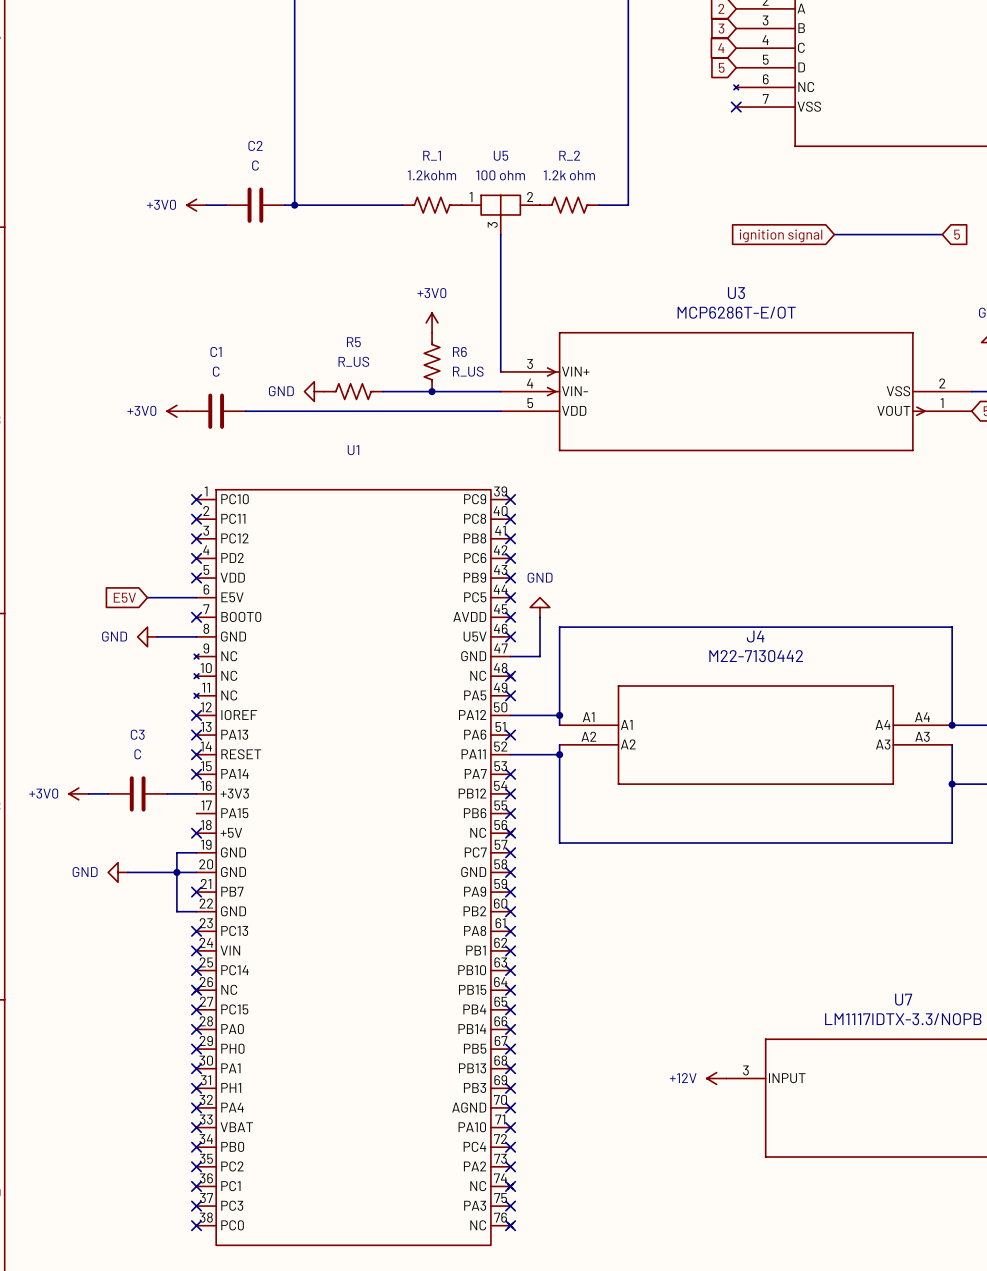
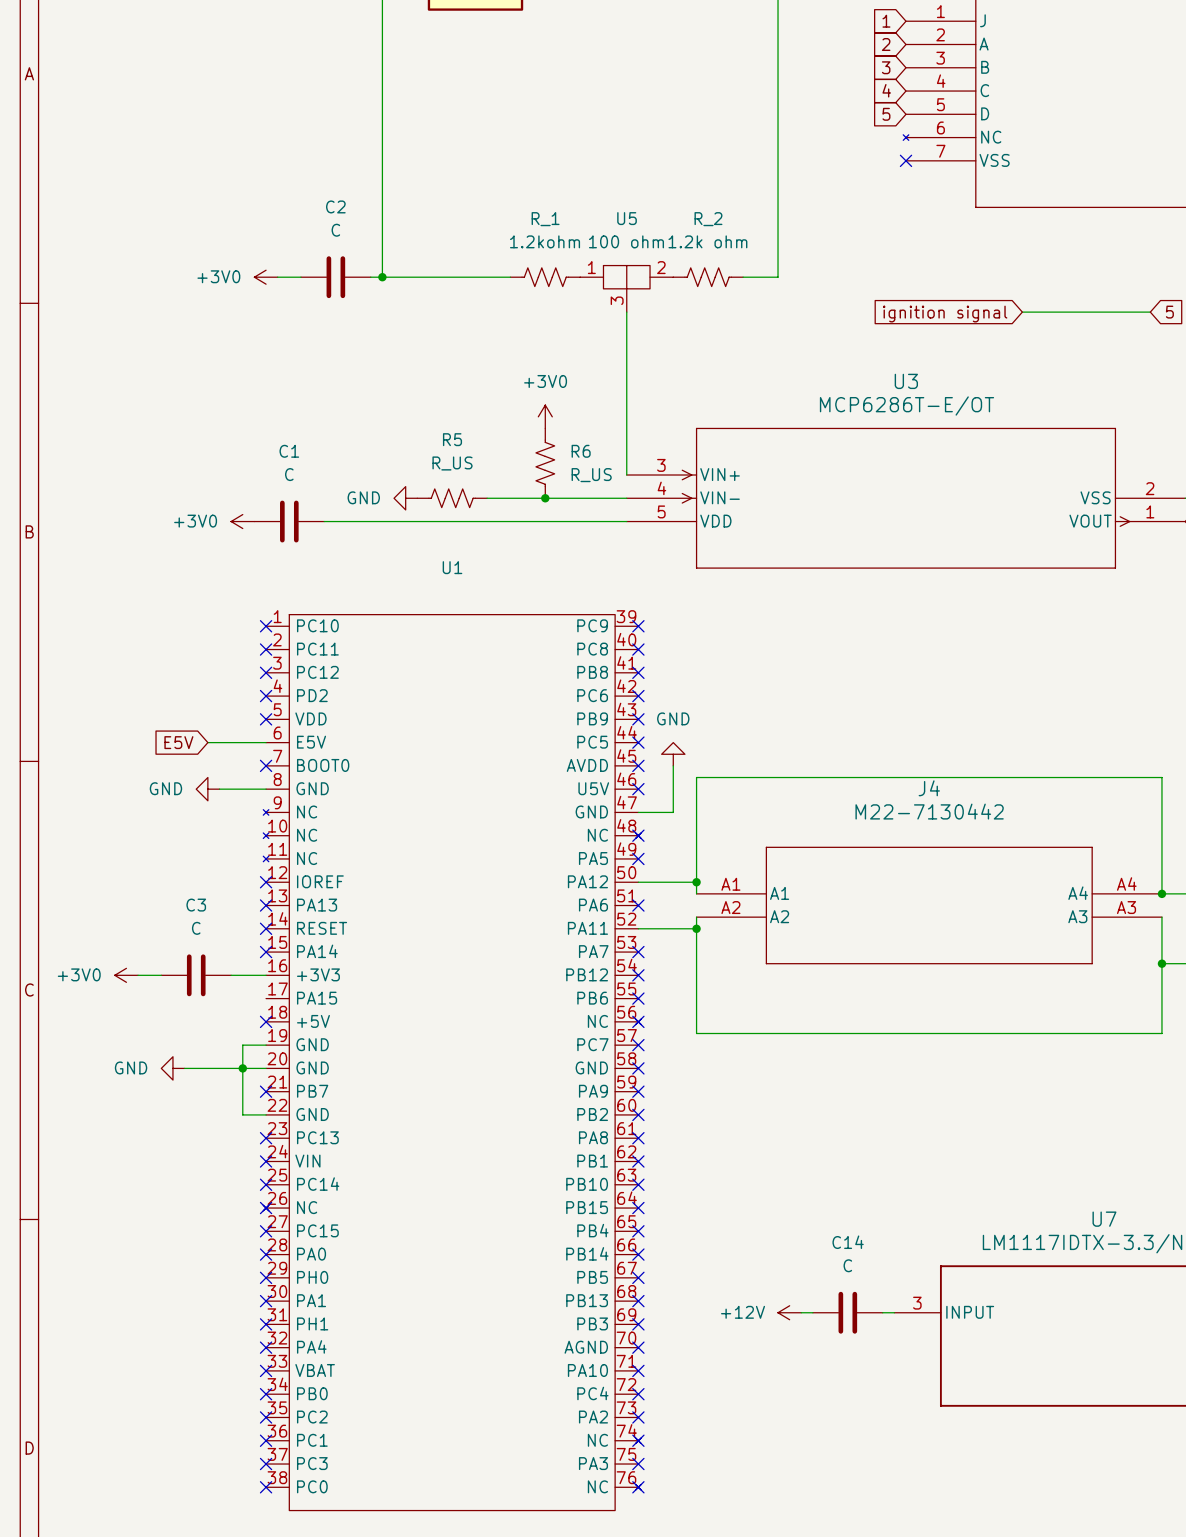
wire: none -> (801, 1312) (812, 1312)
C14: none -> C (847, 1312)
power symbol position: +12V (716, 1078) -> +12V (789, 1312)

